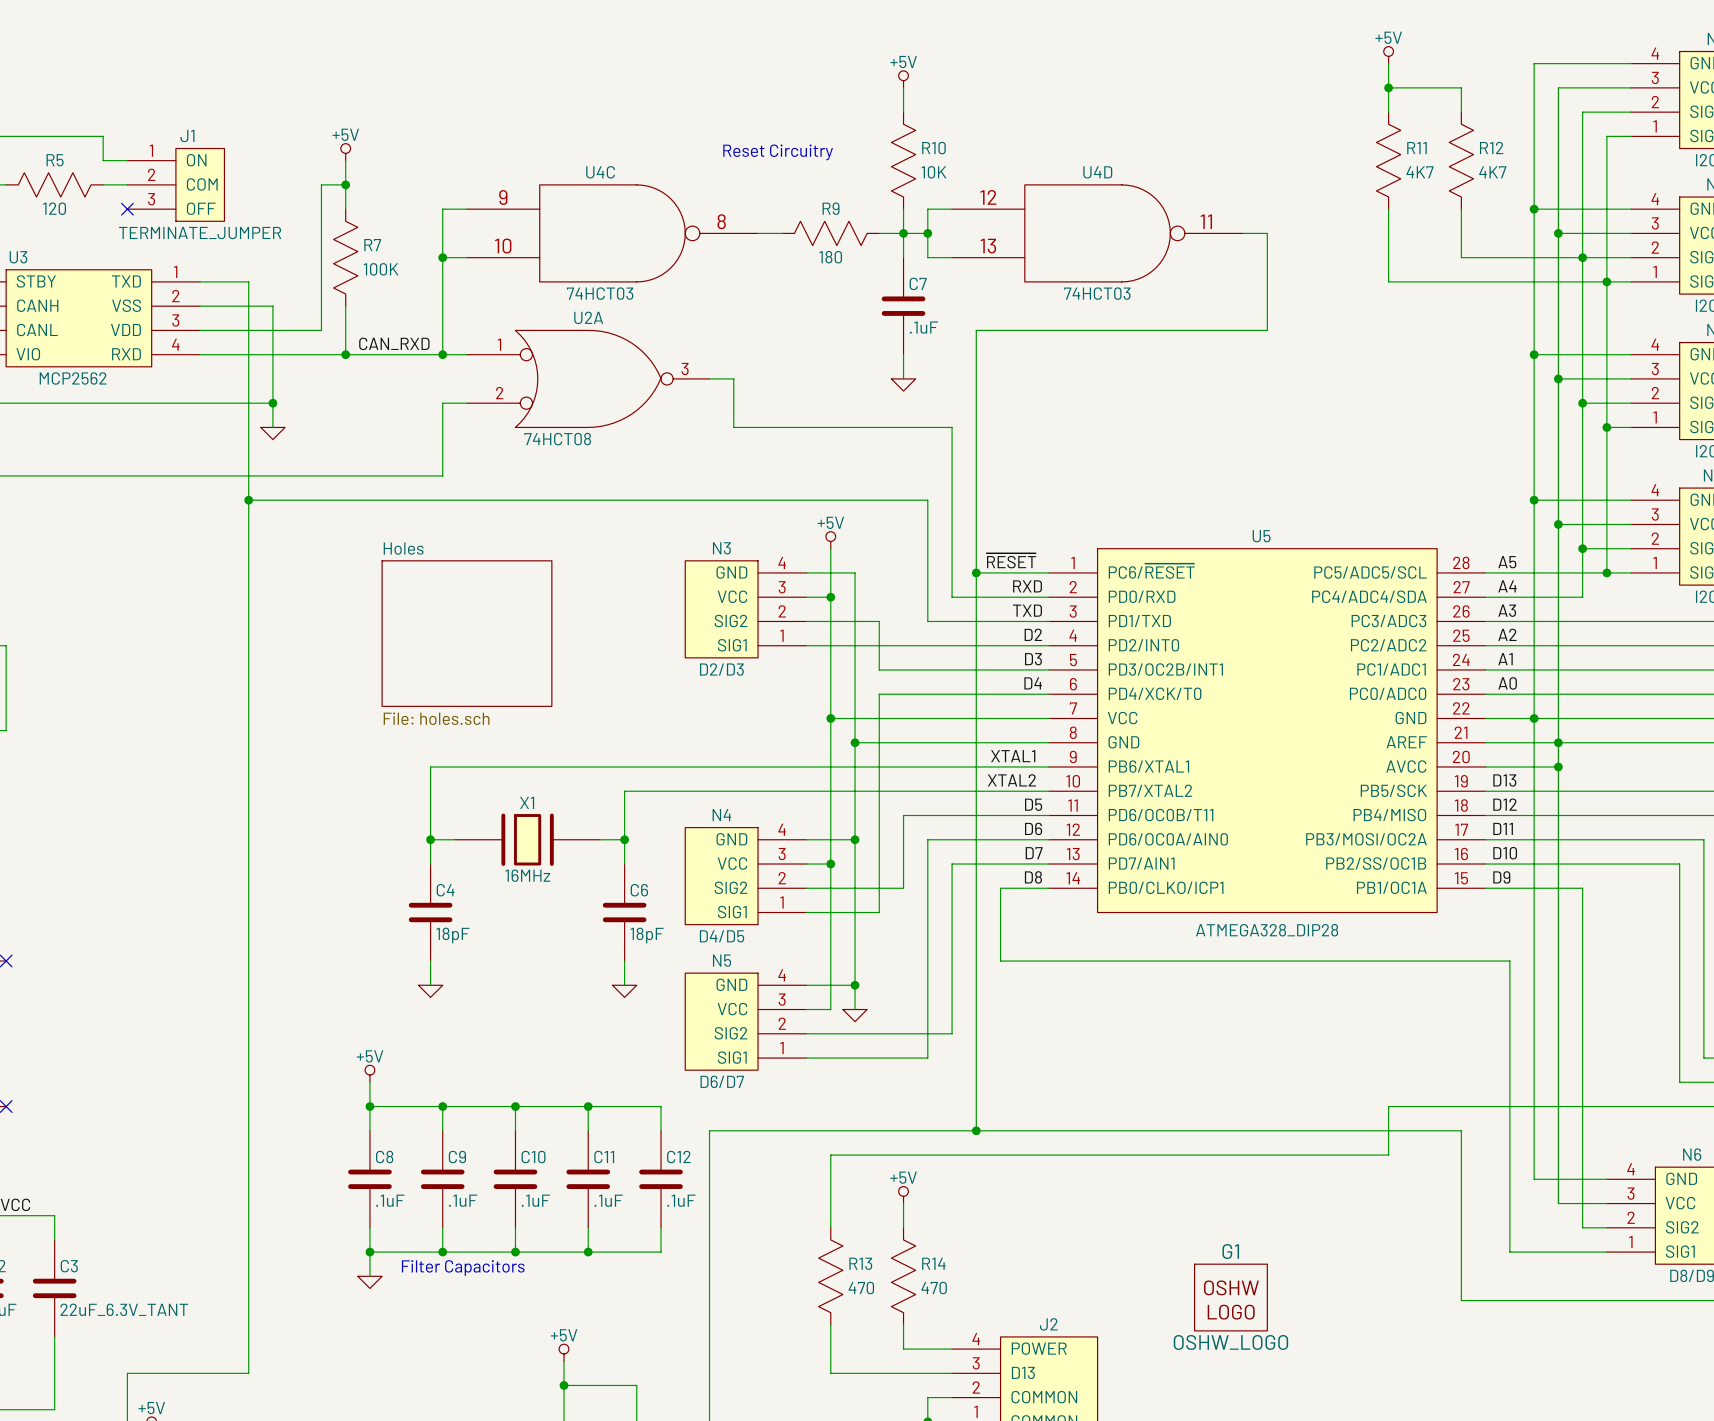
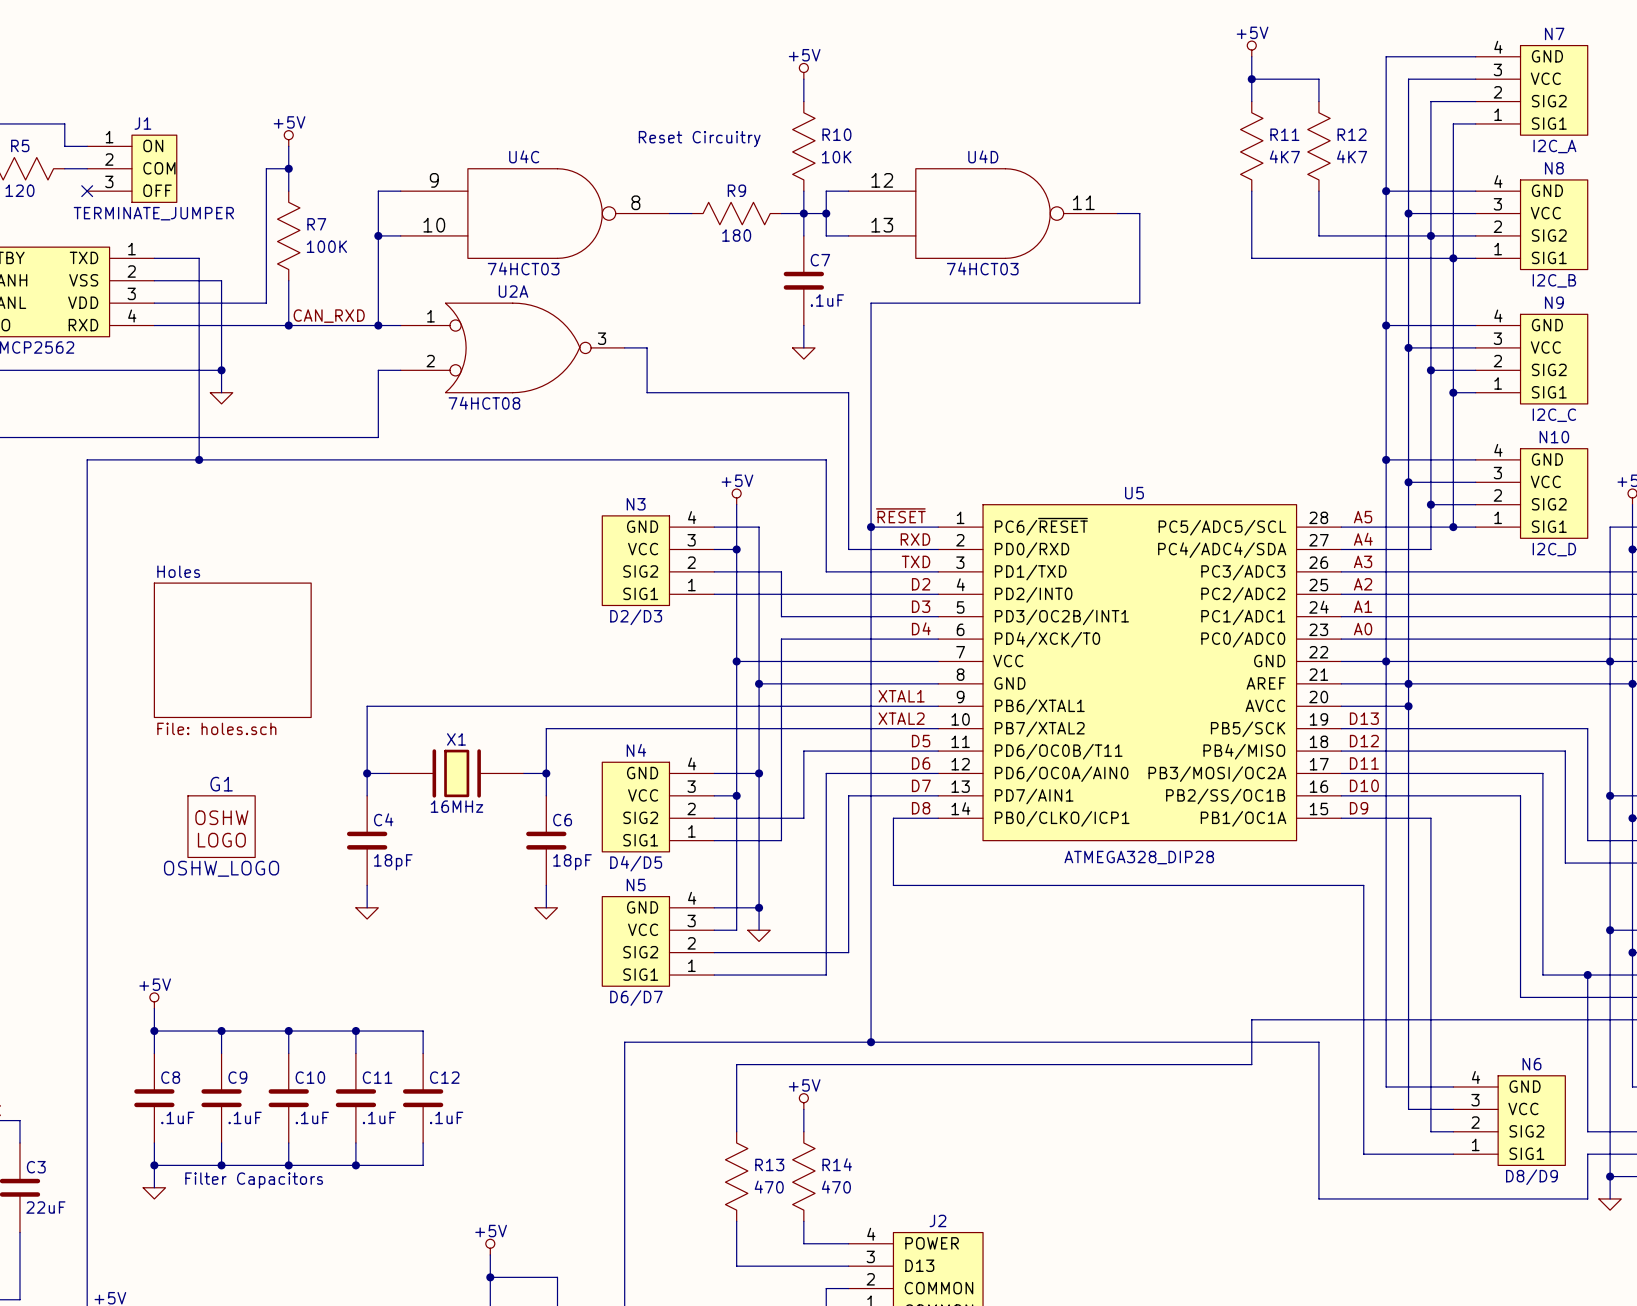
wire: (248, 500) (248, 1373) (127, 1373) -> (199, 459) (87, 459) (87, 1266)
sheet Holes position: (466, 633) -> (232, 650)
power symbol position: +5V (369, 1073) -> +5V (154, 1000)
wire: (369, 1082) (369, 1130) -> (154, 1008) (154, 1053)
wire: (369, 1106) (661, 1106) (661, 1130) -> (154, 1031) (423, 1031) (423, 1053)
junction: (369, 1106) -> none
wire: (442, 1106) (442, 1130) -> (221, 1031) (221, 1053)
junction: (442, 1106) -> none
wire: (515, 1106) (515, 1130) -> (288, 1031) (288, 1053)
junction: (515, 1106) -> none
wire: (588, 1106) (588, 1130) -> (355, 1031) (355, 1053)
junction: (588, 1106) -> none
junction: none -> (154, 1031)
junction: none -> (221, 1031)
junction: none -> (288, 1031)
junction: none -> (355, 1031)
C8 position: (369, 1179) -> (154, 1098)
C9 position: (442, 1179) -> (221, 1098)
C10 position: (515, 1179) -> (288, 1098)
C11 position: (588, 1179) -> (355, 1098)
C12 position: (661, 1179) -> (423, 1098)
wire: (369, 1227) (369, 1276) -> (154, 1142) (154, 1187)
wire: (442, 1227) (442, 1252) -> (221, 1142) (221, 1165)
wire: (515, 1227) (515, 1252) -> (288, 1142) (288, 1165)
wire: (588, 1227) (588, 1252) -> (355, 1142) (355, 1165)
wire: (661, 1227) (661, 1252) (369, 1252) -> (423, 1142) (423, 1165) (154, 1165)
junction: (369, 1252) -> none
junction: (442, 1252) -> none
junction: (515, 1252) -> none
junction: (588, 1252) -> none
junction: none -> (154, 1165)
junction: none -> (221, 1165)
junction: none -> (288, 1165)
junction: none -> (355, 1165)
text position: Filter Capacitors (463, 1267) -> Filter Capacitors (254, 1180)
power symbol position: (369, 1282) -> (154, 1193)
G1 position: (1230, 1297) -> (221, 826)
C3 value: 22uF_6.3V_TANT (124, 1309) -> 22uF (45, 1207)

